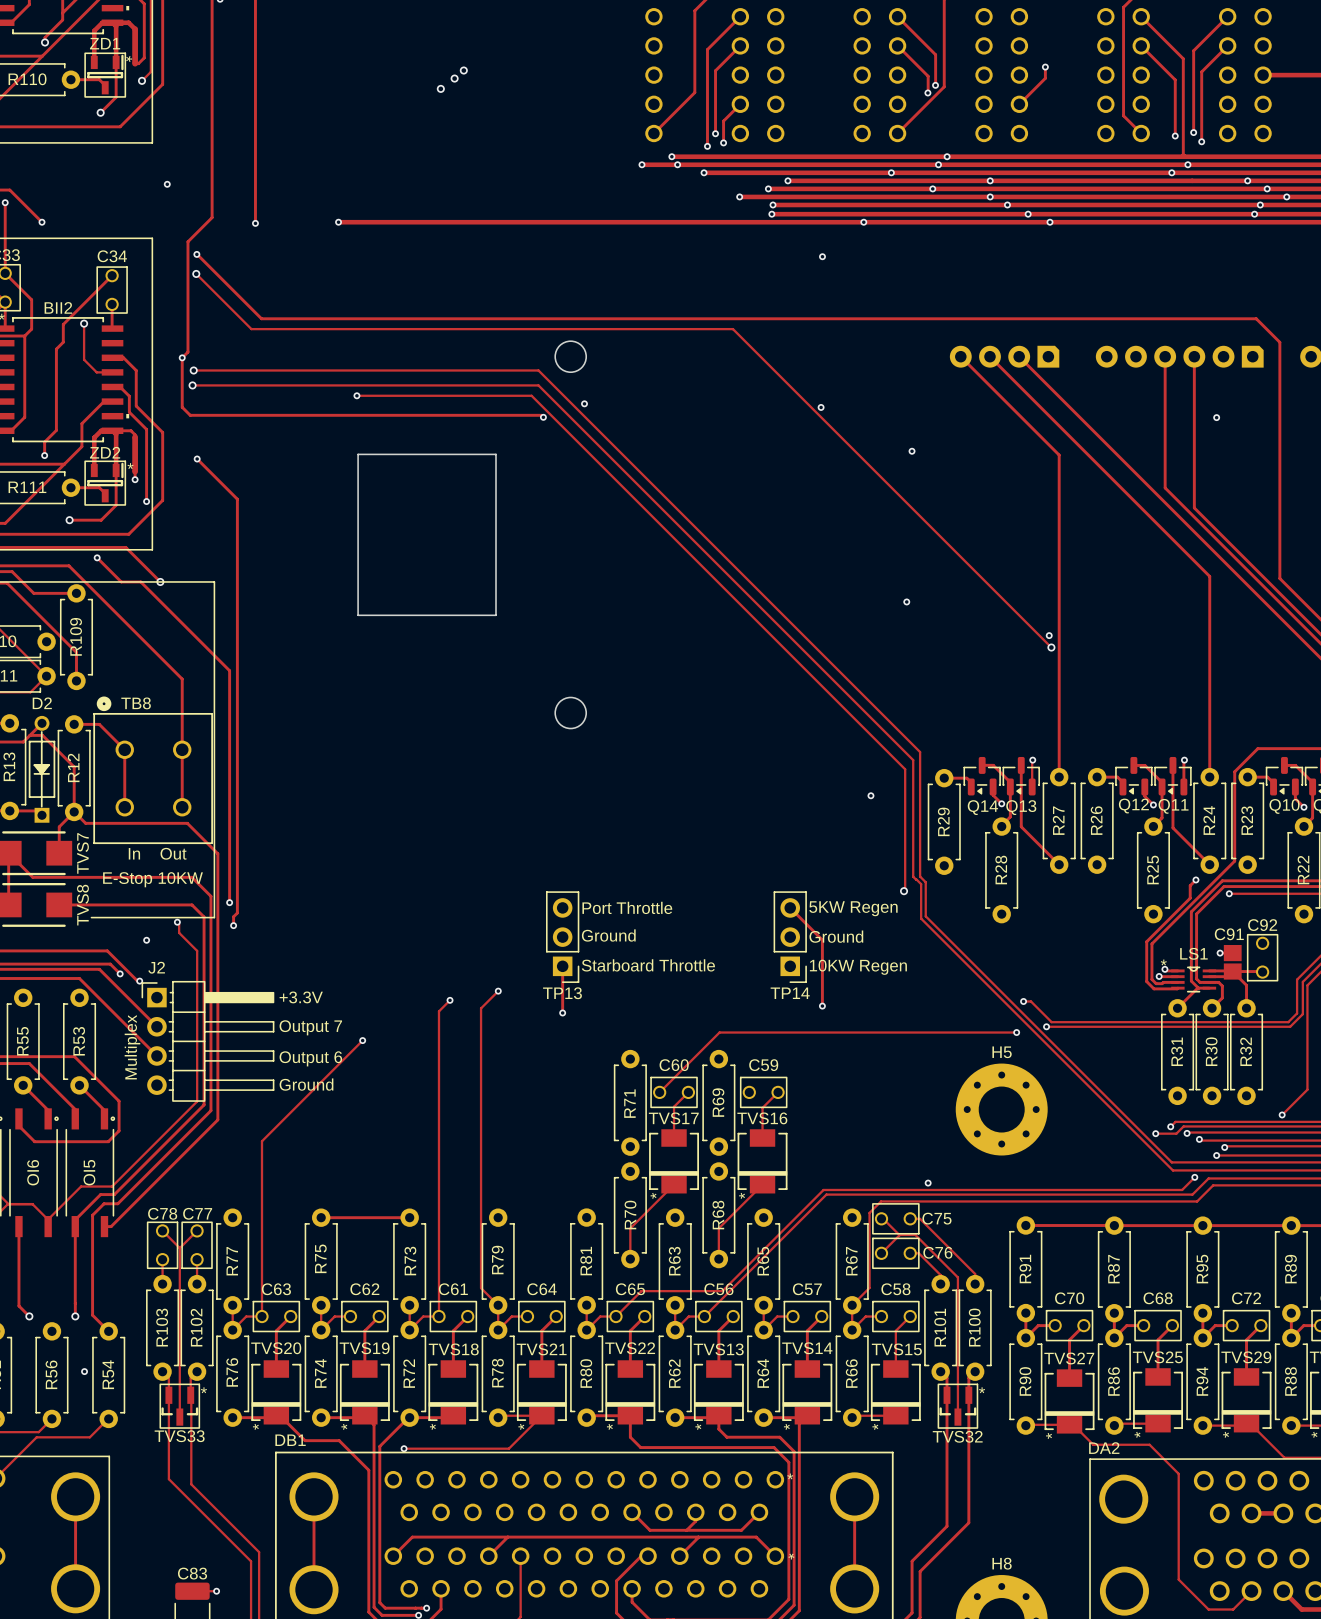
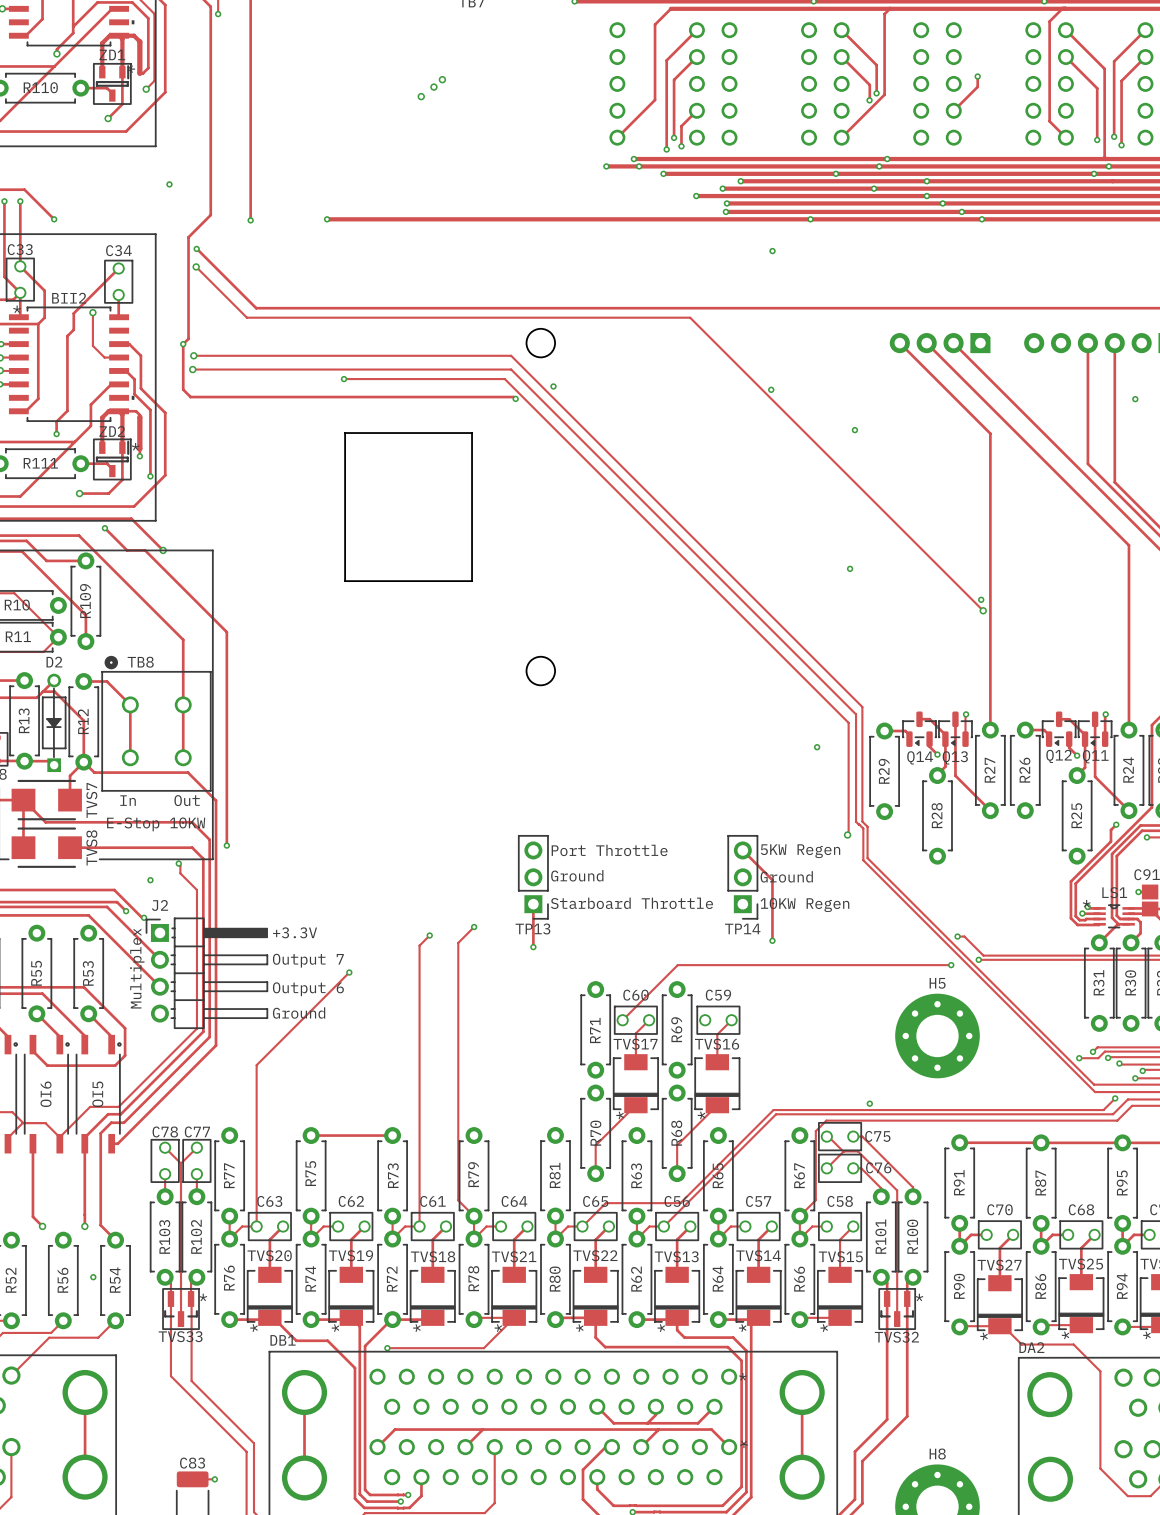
track: (197, 458) (237, 499) (237, 912) (233, 916) (233, 925) -> none
via: (197, 458) -> none
via: (233, 925) -> none

